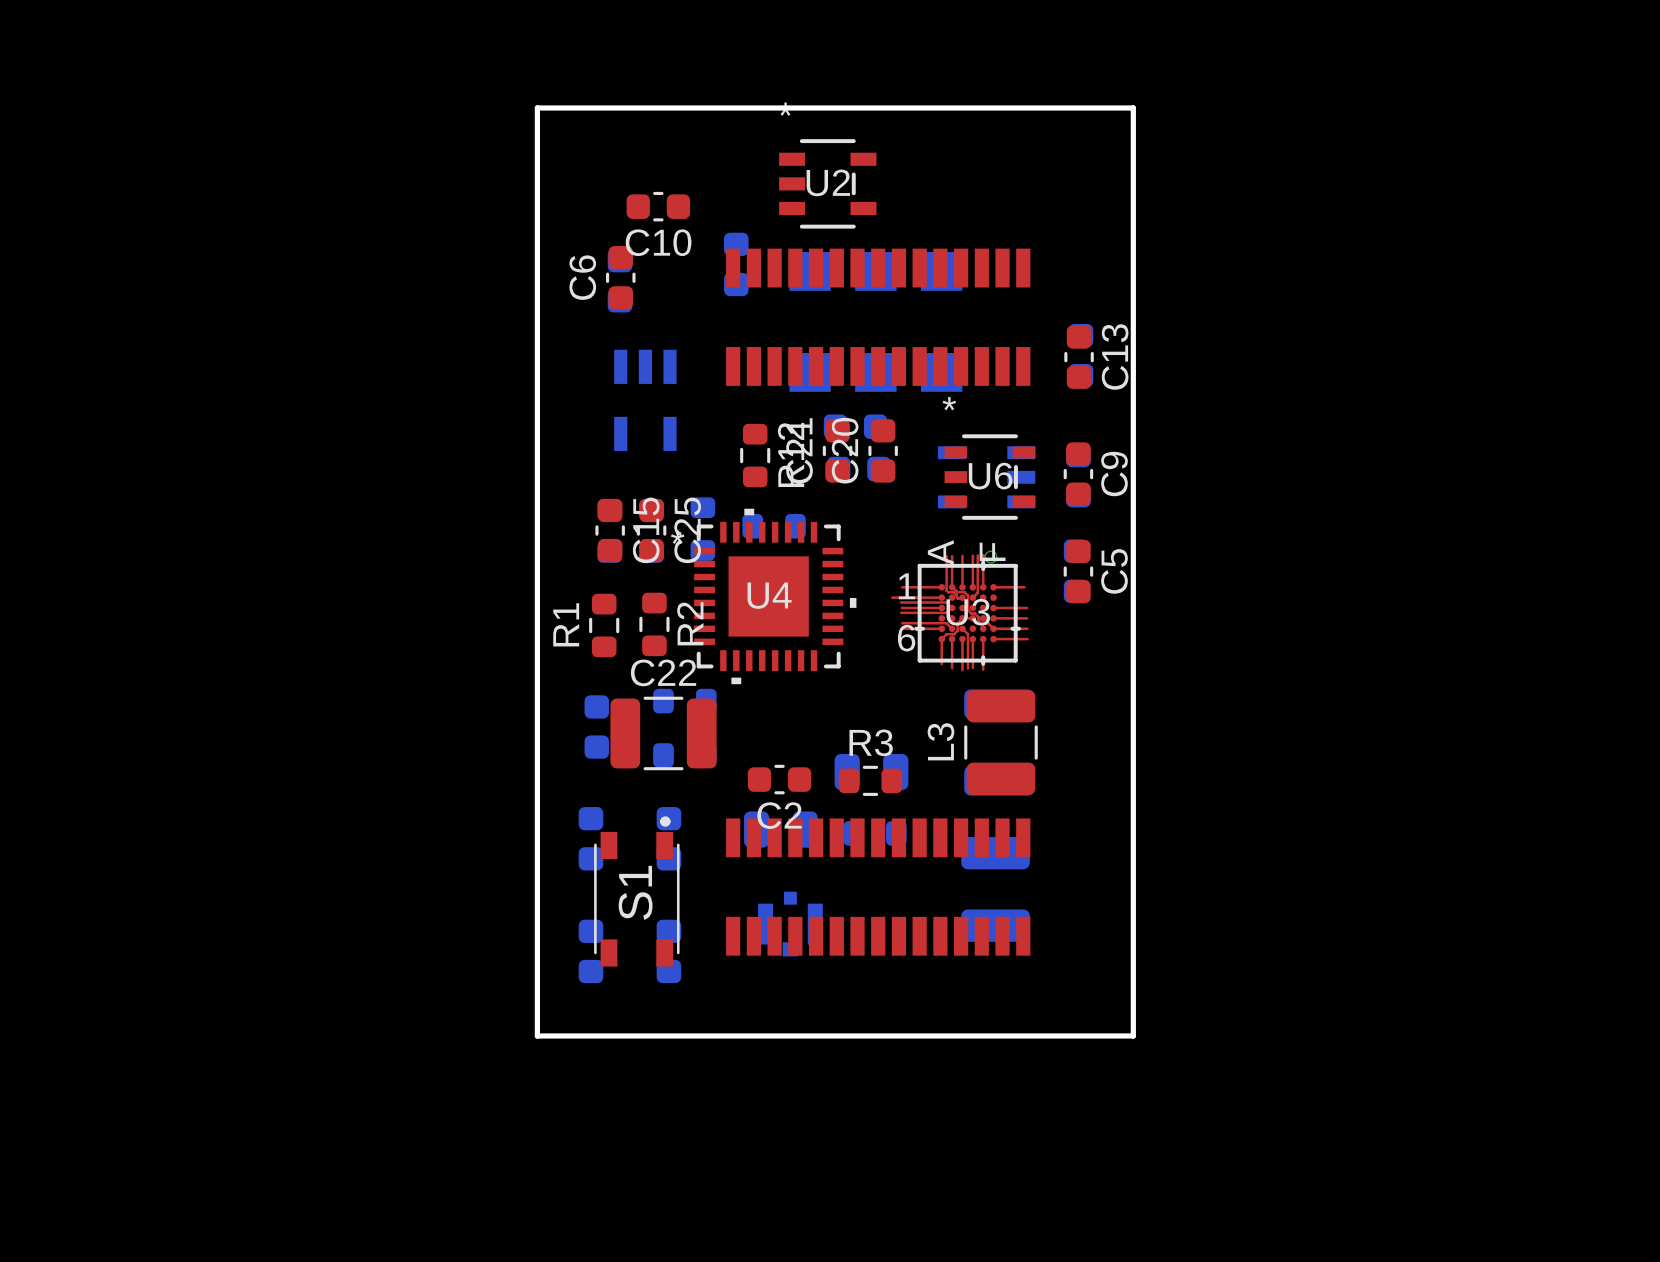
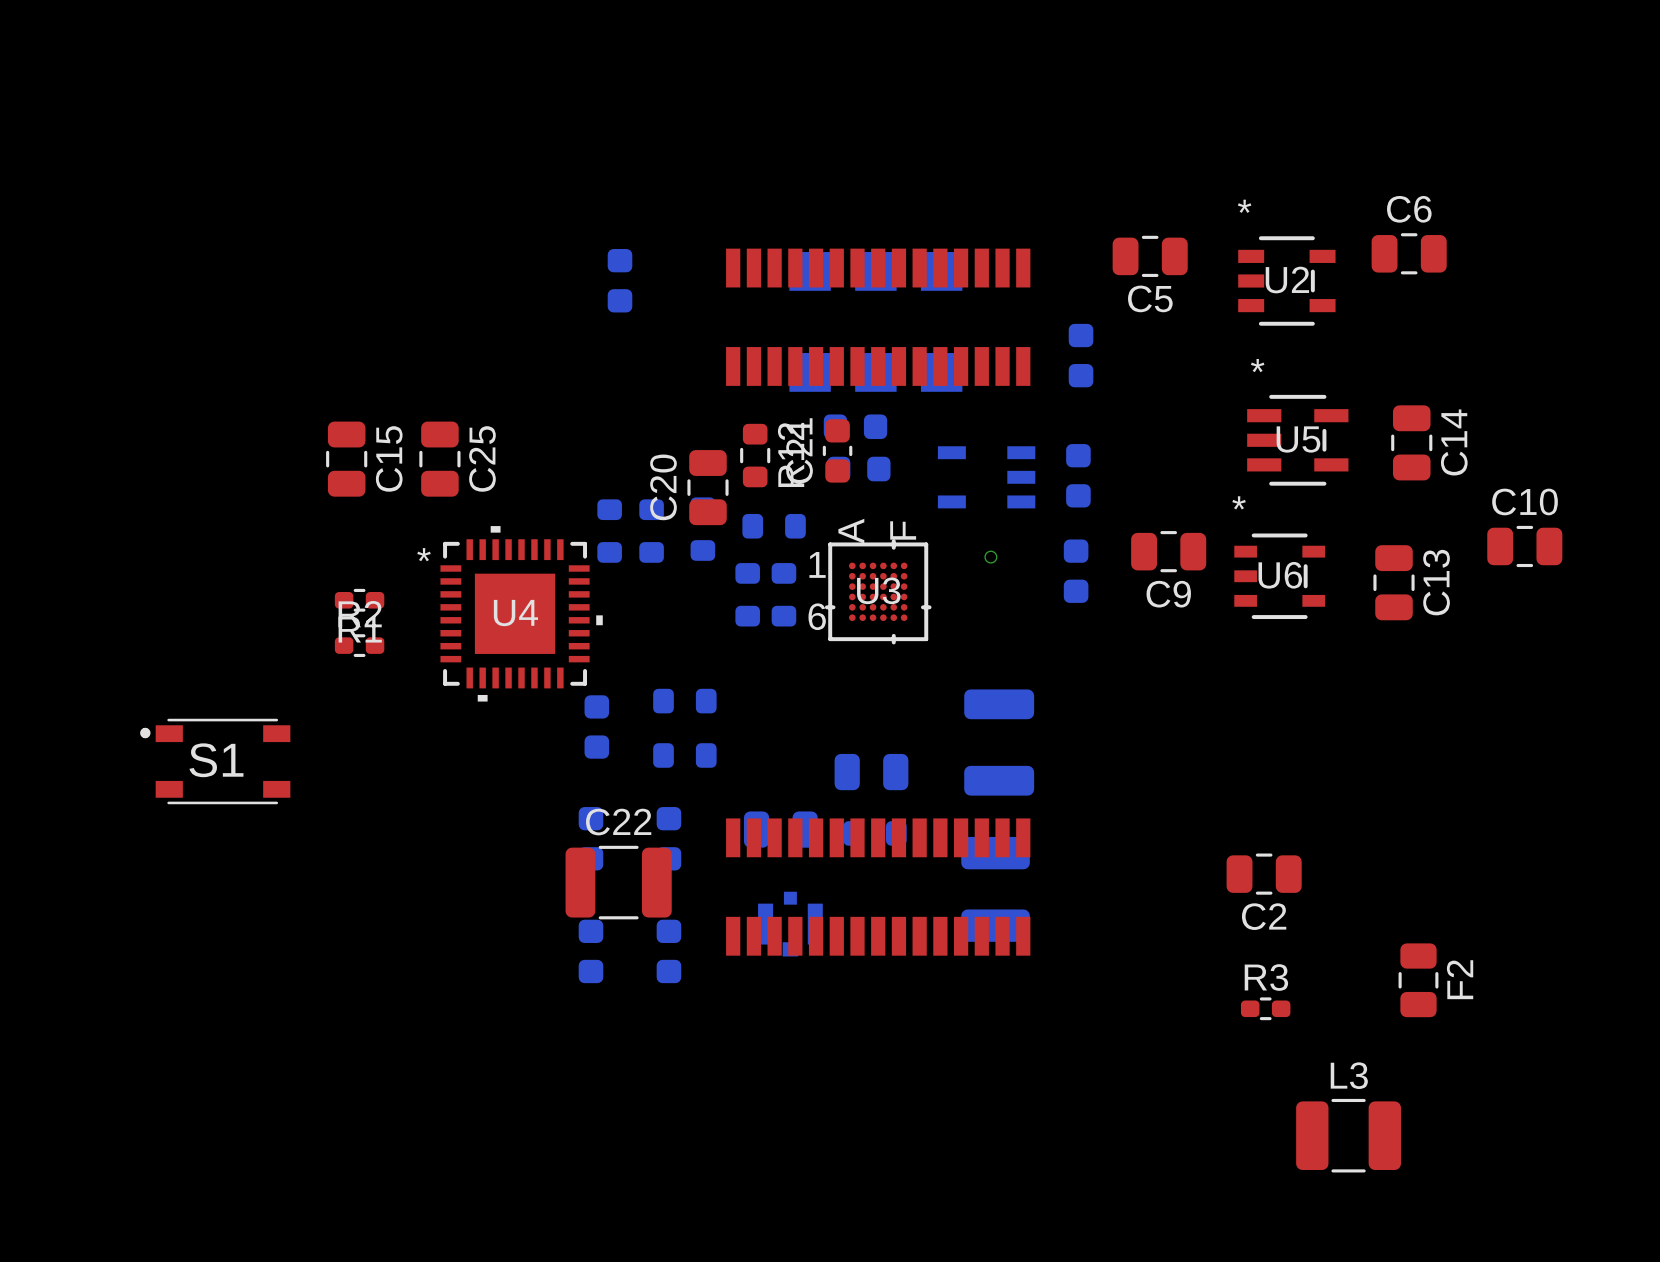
board edge: (537, 107) (1133, 107) (1133, 1035) (537, 1035) (537, 107) -> none
U2 position: (827, 183) -> (1286, 280)
C10 footprint: [626, 191, 691, 222] -> [1487, 525, 1563, 568]
C10 name position: C10 (658, 242) -> C10 (1525, 501)
C6 footprint: [606, 246, 636, 310] -> [1371, 233, 1447, 275]
part: (736, 264) -> none
C6 name position: C6 (582, 277) -> C6 (1409, 209)
C13 footprint: [1064, 325, 1094, 389] -> [1373, 545, 1415, 621]
part: (645, 400) -> none
C20 footprint: [868, 419, 898, 483] -> [687, 450, 729, 526]
U5: none -> (1297, 440)
C9 footprint: [1063, 442, 1094, 506] -> [1131, 531, 1207, 573]
C14: none -> (1411, 442)
C9 name position: C9 (1114, 474) -> C9 (1168, 594)
U6 position: (989, 477) -> (1279, 576)
C15 footprint: [595, 498, 625, 563] -> [326, 421, 368, 497]
C25 footprint: [636, 498, 667, 563] -> [419, 421, 461, 497]
C5 footprint: [1063, 539, 1094, 604] -> [1112, 235, 1188, 277]
top track: (962, 555) (962, 587) -> none
top track: (972, 555) (972, 587) -> none
top track: (977, 555) (977, 592) (972, 597) -> none
top track: (983, 555) (983, 587) -> none
top track: (946, 556) (946, 590) (953, 592) (958, 598) (962, 597) -> none
top track: (952, 556) (952, 587) (957, 592) (964, 592) (968, 595) (968, 610) (971, 613) (974, 613) (981, 623) (988, 623) (993, 628) (1027, 628) -> none
C5 name position: C5 (1114, 571) -> C5 (1150, 298)
top track: (902, 587) (941, 587) -> none
top track: (993, 587) (1024, 587) -> none
R2 footprint: [639, 592, 670, 657] -> [334, 634, 385, 657]
R1 footprint: [589, 593, 620, 658] -> [334, 588, 385, 612]
U4 position: (775, 596) -> (521, 613)
top track: (892, 597) (941, 597) -> none
top track: (900, 602) (946, 602) (952, 608) -> none
top track: (901, 608) (941, 608) -> none
top track: (993, 608) (1027, 608) -> none
top track: (901, 612) (946, 612) (952, 618) -> none
U3 position: (967, 613) -> (878, 591)
top track: (972, 618) (962, 618) (957, 623) (957, 630) (954, 634) (946, 634) (941, 639) (941, 664) -> none
top track: (993, 618) (1026, 618) -> none
top track: (902, 623) (946, 623) (952, 628) -> none
top track: (901, 628) (941, 628) -> none
top track: (962, 628) (968, 634) (968, 668) -> none
top track: (952, 639) (952, 668) -> none
top track: (962, 639) (962, 670) -> none
top track: (972, 639) (972, 667) -> none
top track: (983, 639) (983, 669) -> none
top track: (993, 639) (1027, 639) -> none
C22 position: (663, 733) -> (618, 882)
L3 rotation: 0° (1000, 742) -> 90° clockwise (1348, 1135)
L3 position: (1000, 742) -> (1348, 1135)
C2 footprint: [747, 764, 812, 795] -> [1226, 853, 1302, 895]
R3 footprint: [838, 765, 903, 796] -> [1240, 997, 1291, 1021]
S1 rotation: 0° (636, 891) -> 90° counterclockwise (215, 761)
S1 position: (636, 891) -> (215, 761)
F2: none -> (1418, 980)

